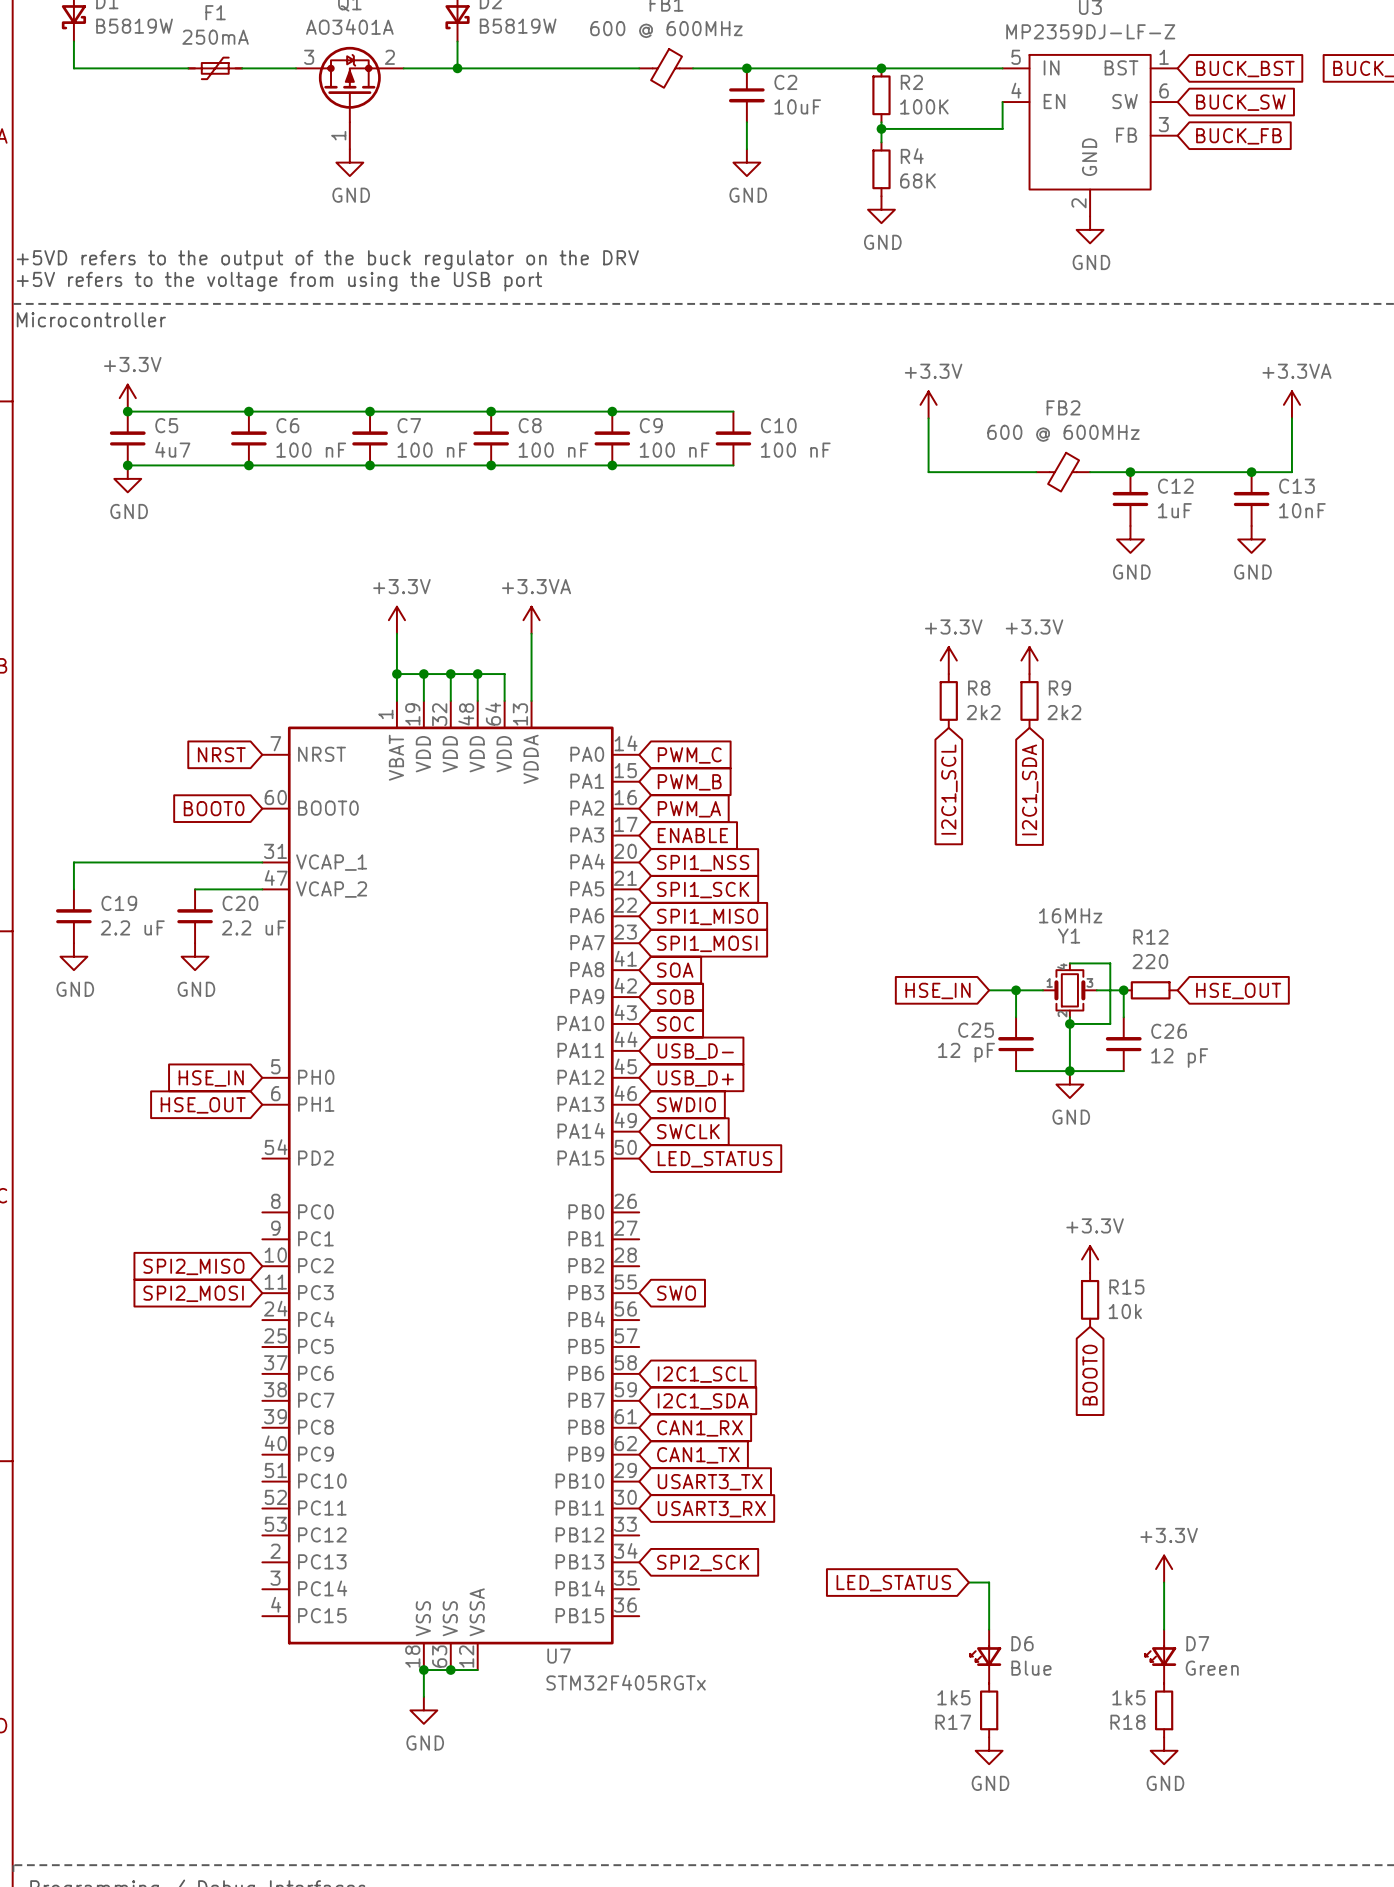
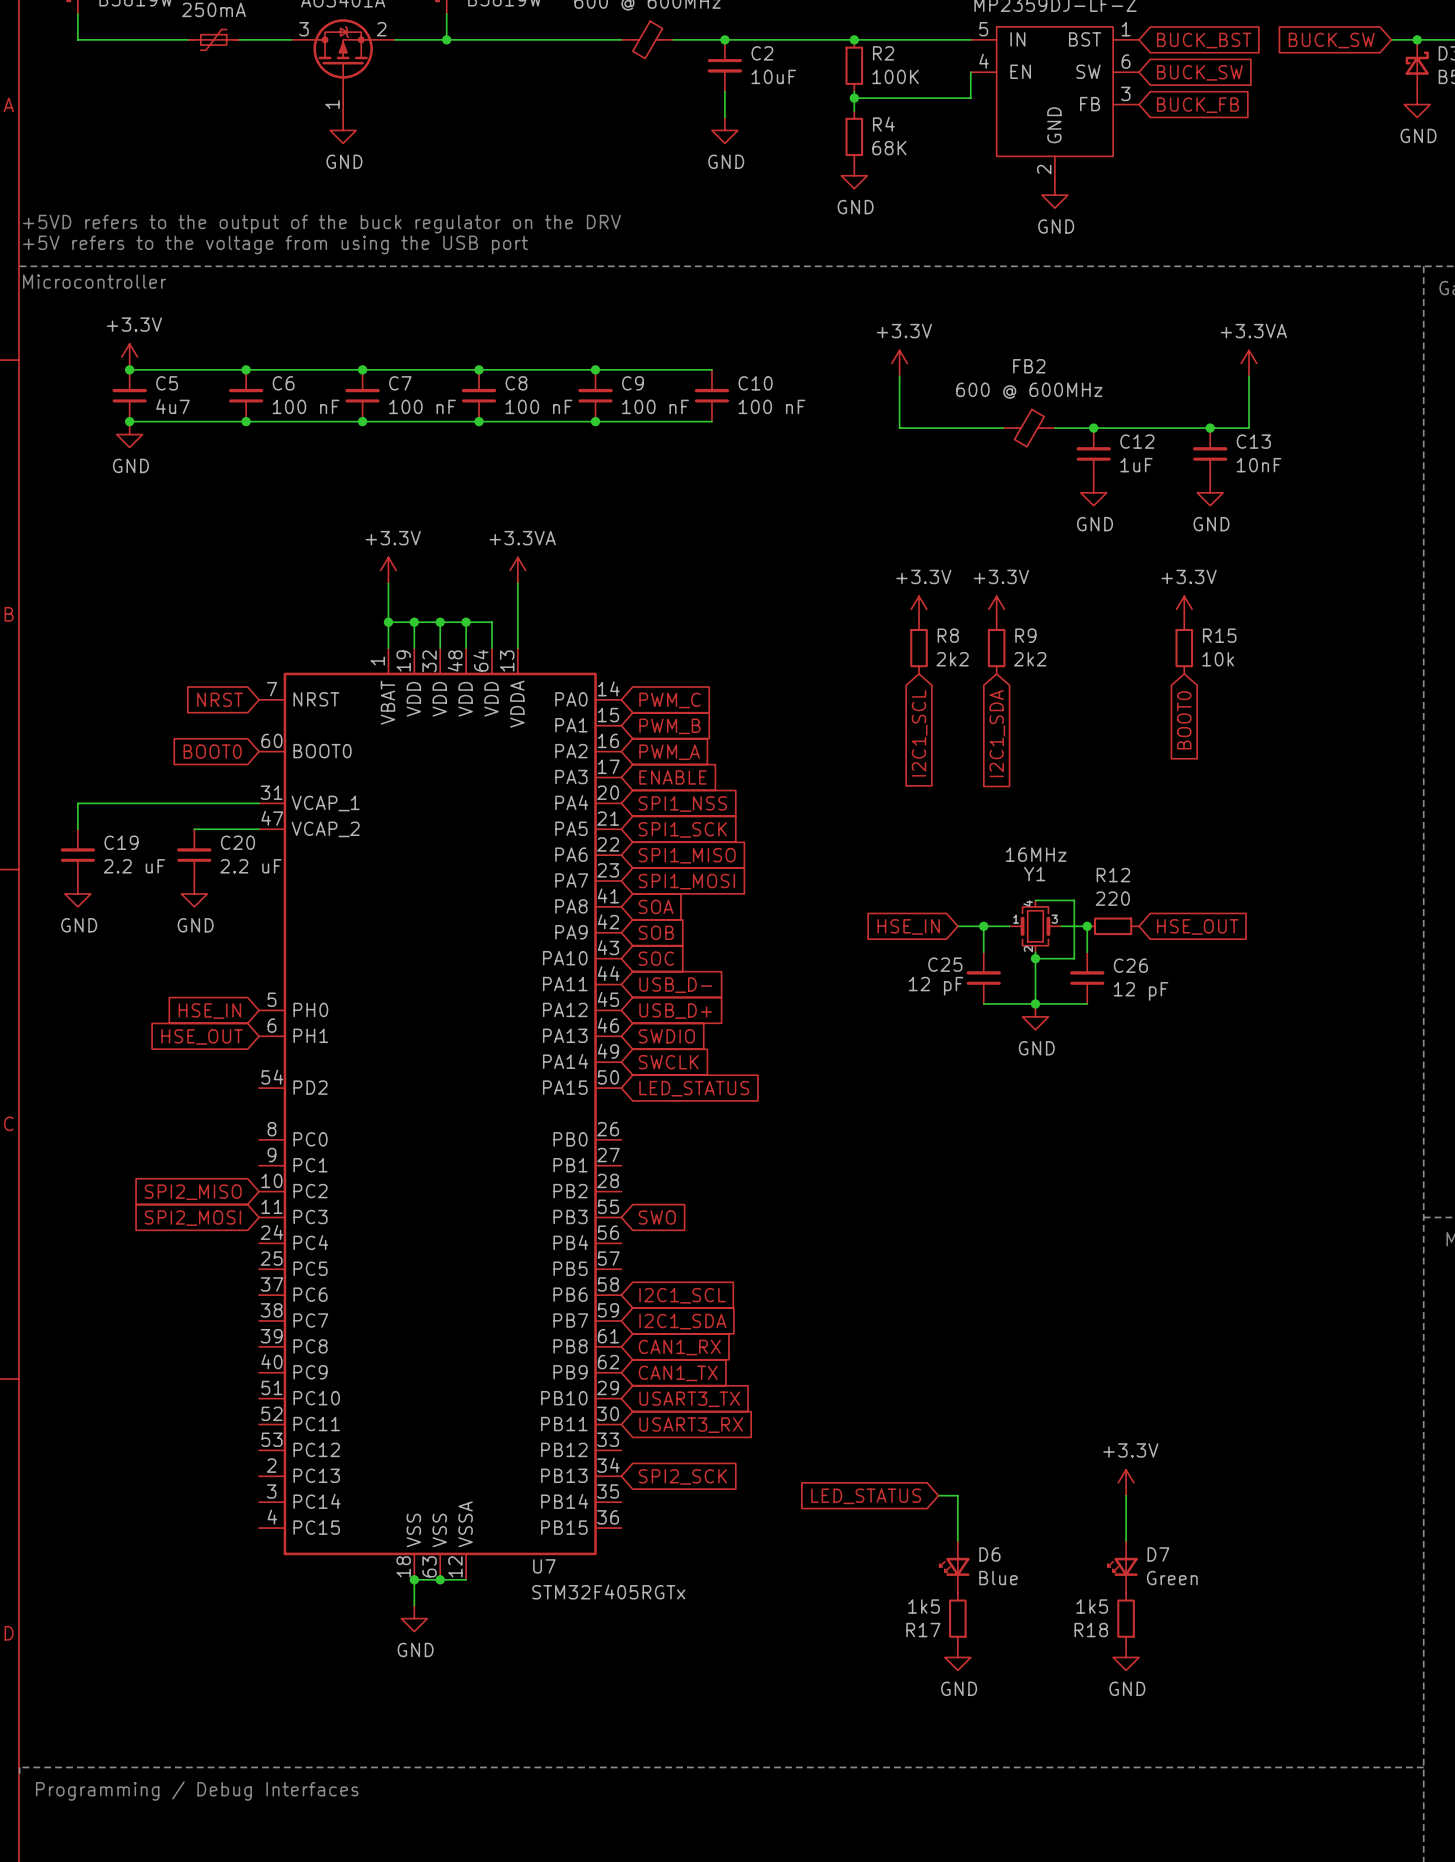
power symbol: none -> +3.3V (1184, 609)
global label: none -> BOOT0 (1184, 720)
power symbol: +3.3V (1090, 1259) -> none
R15 position: (1090, 1299) -> (1184, 648)
global label: BOOT0 (1090, 1375) -> none

